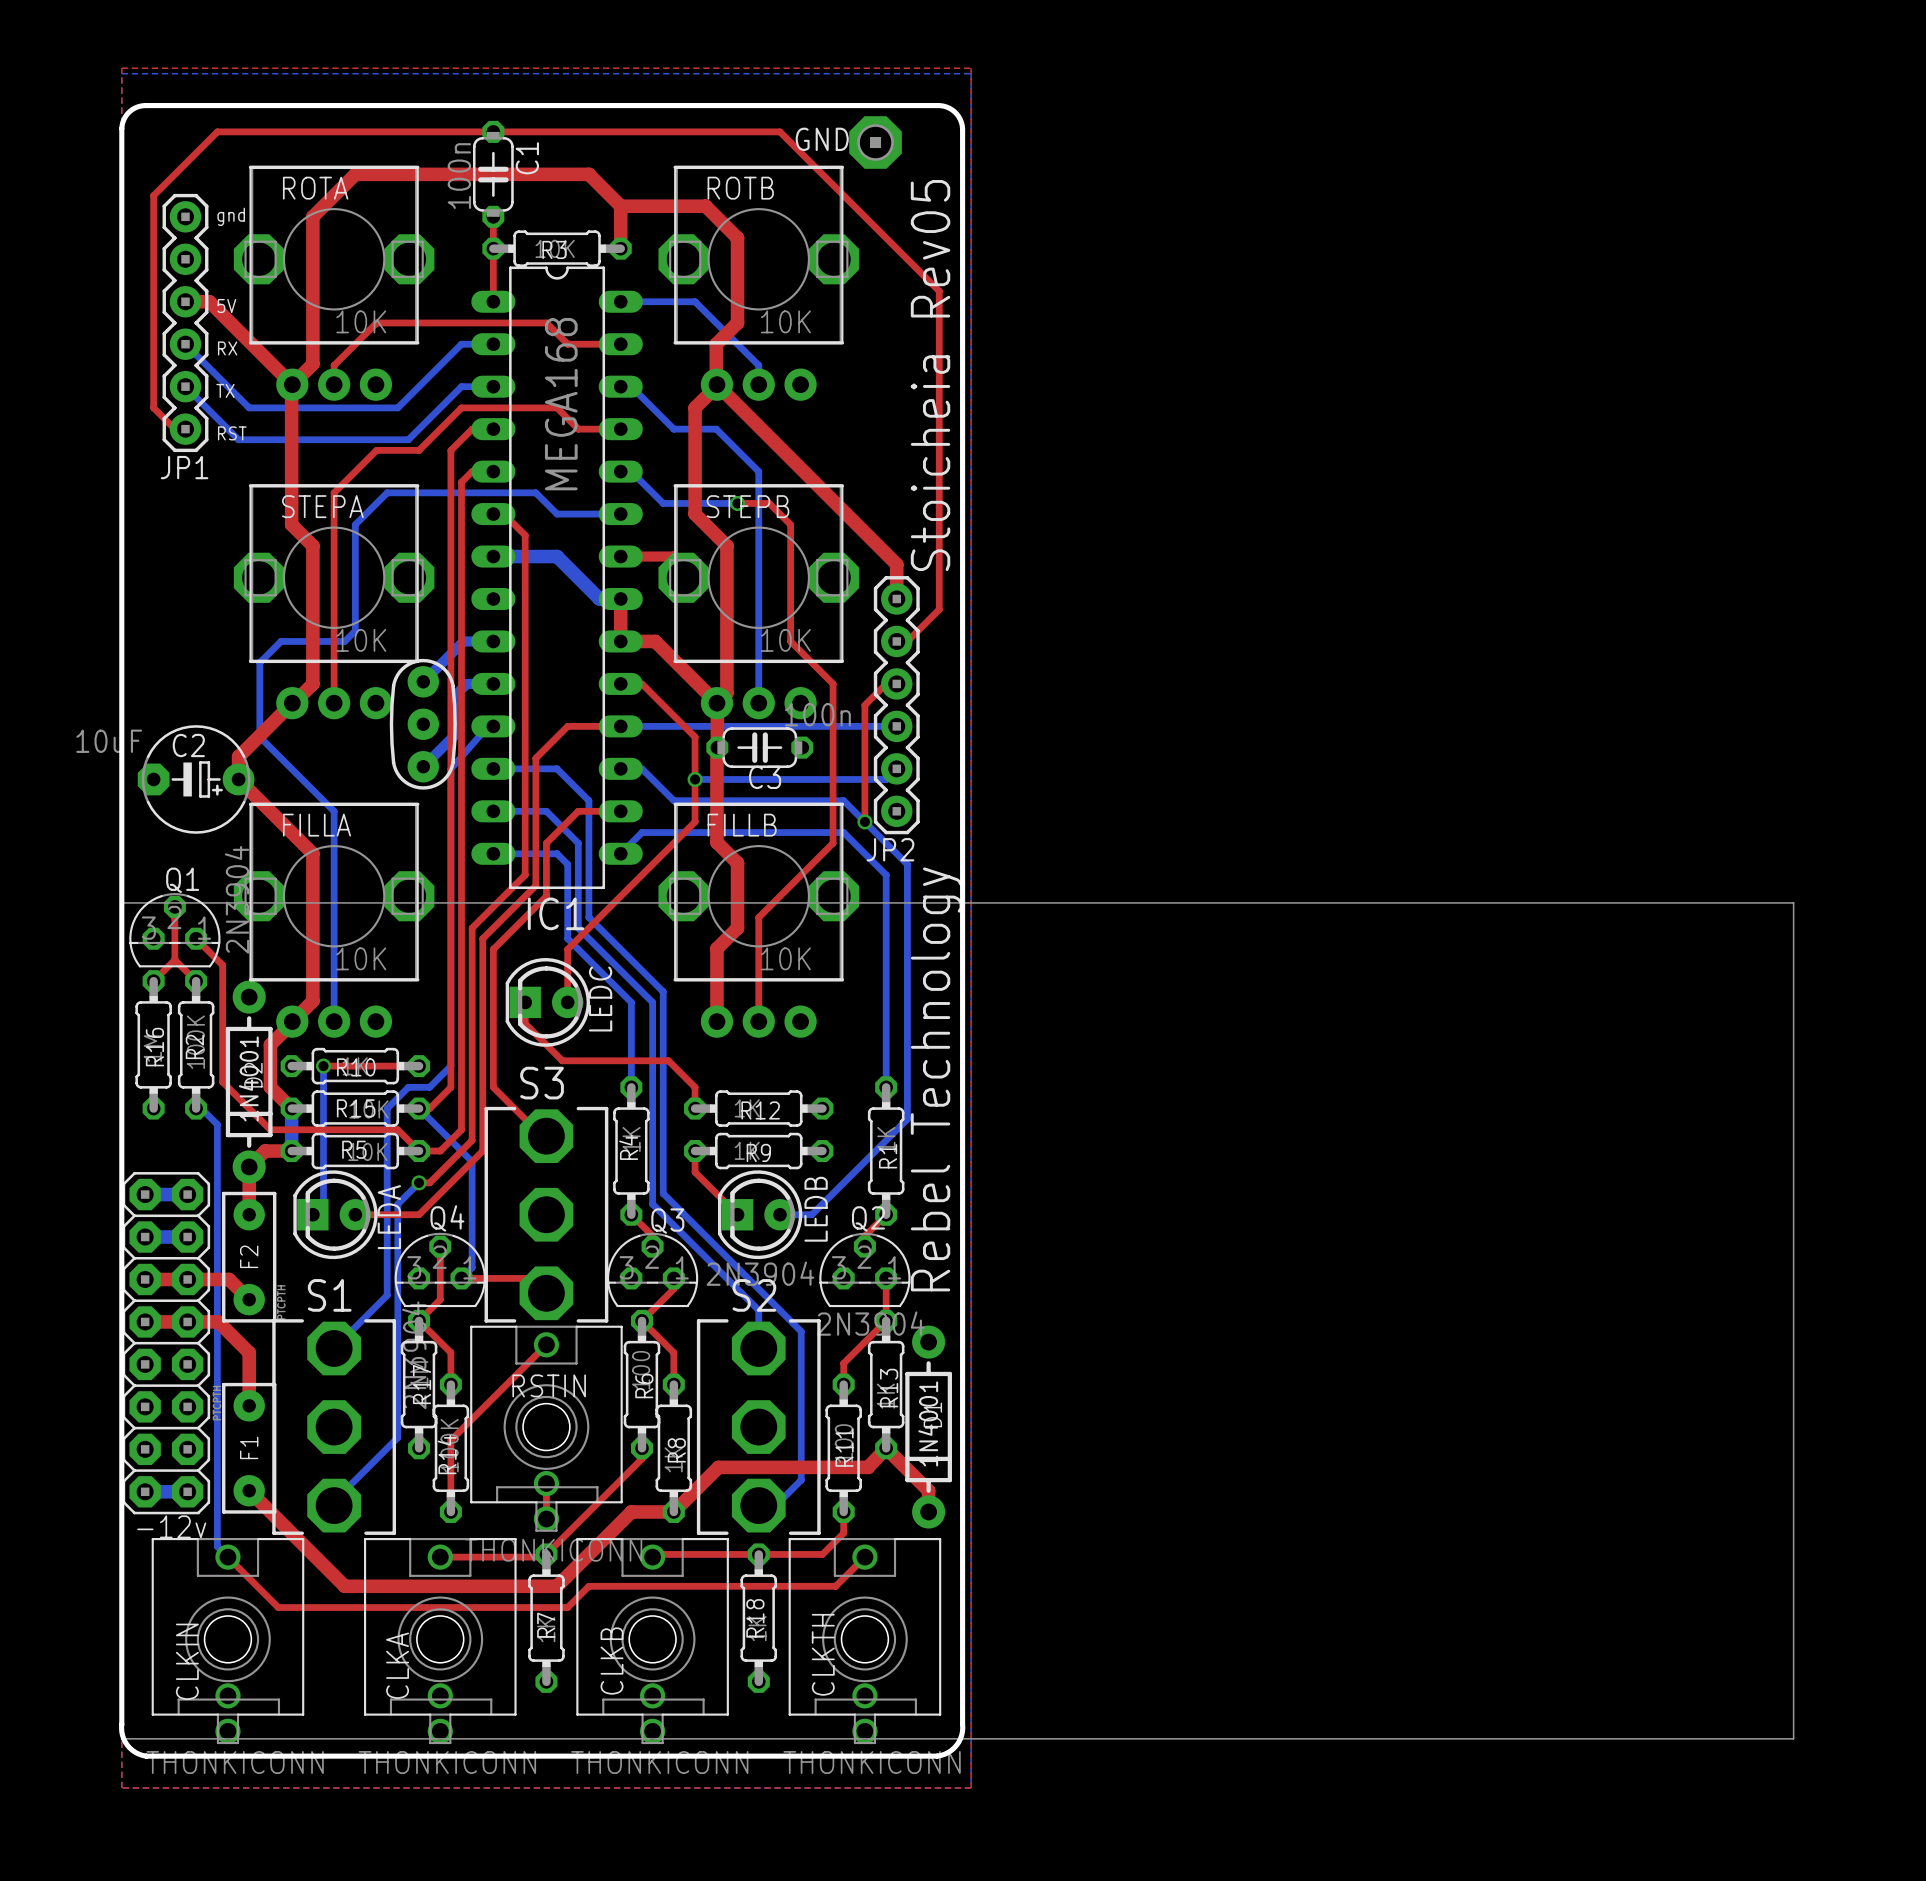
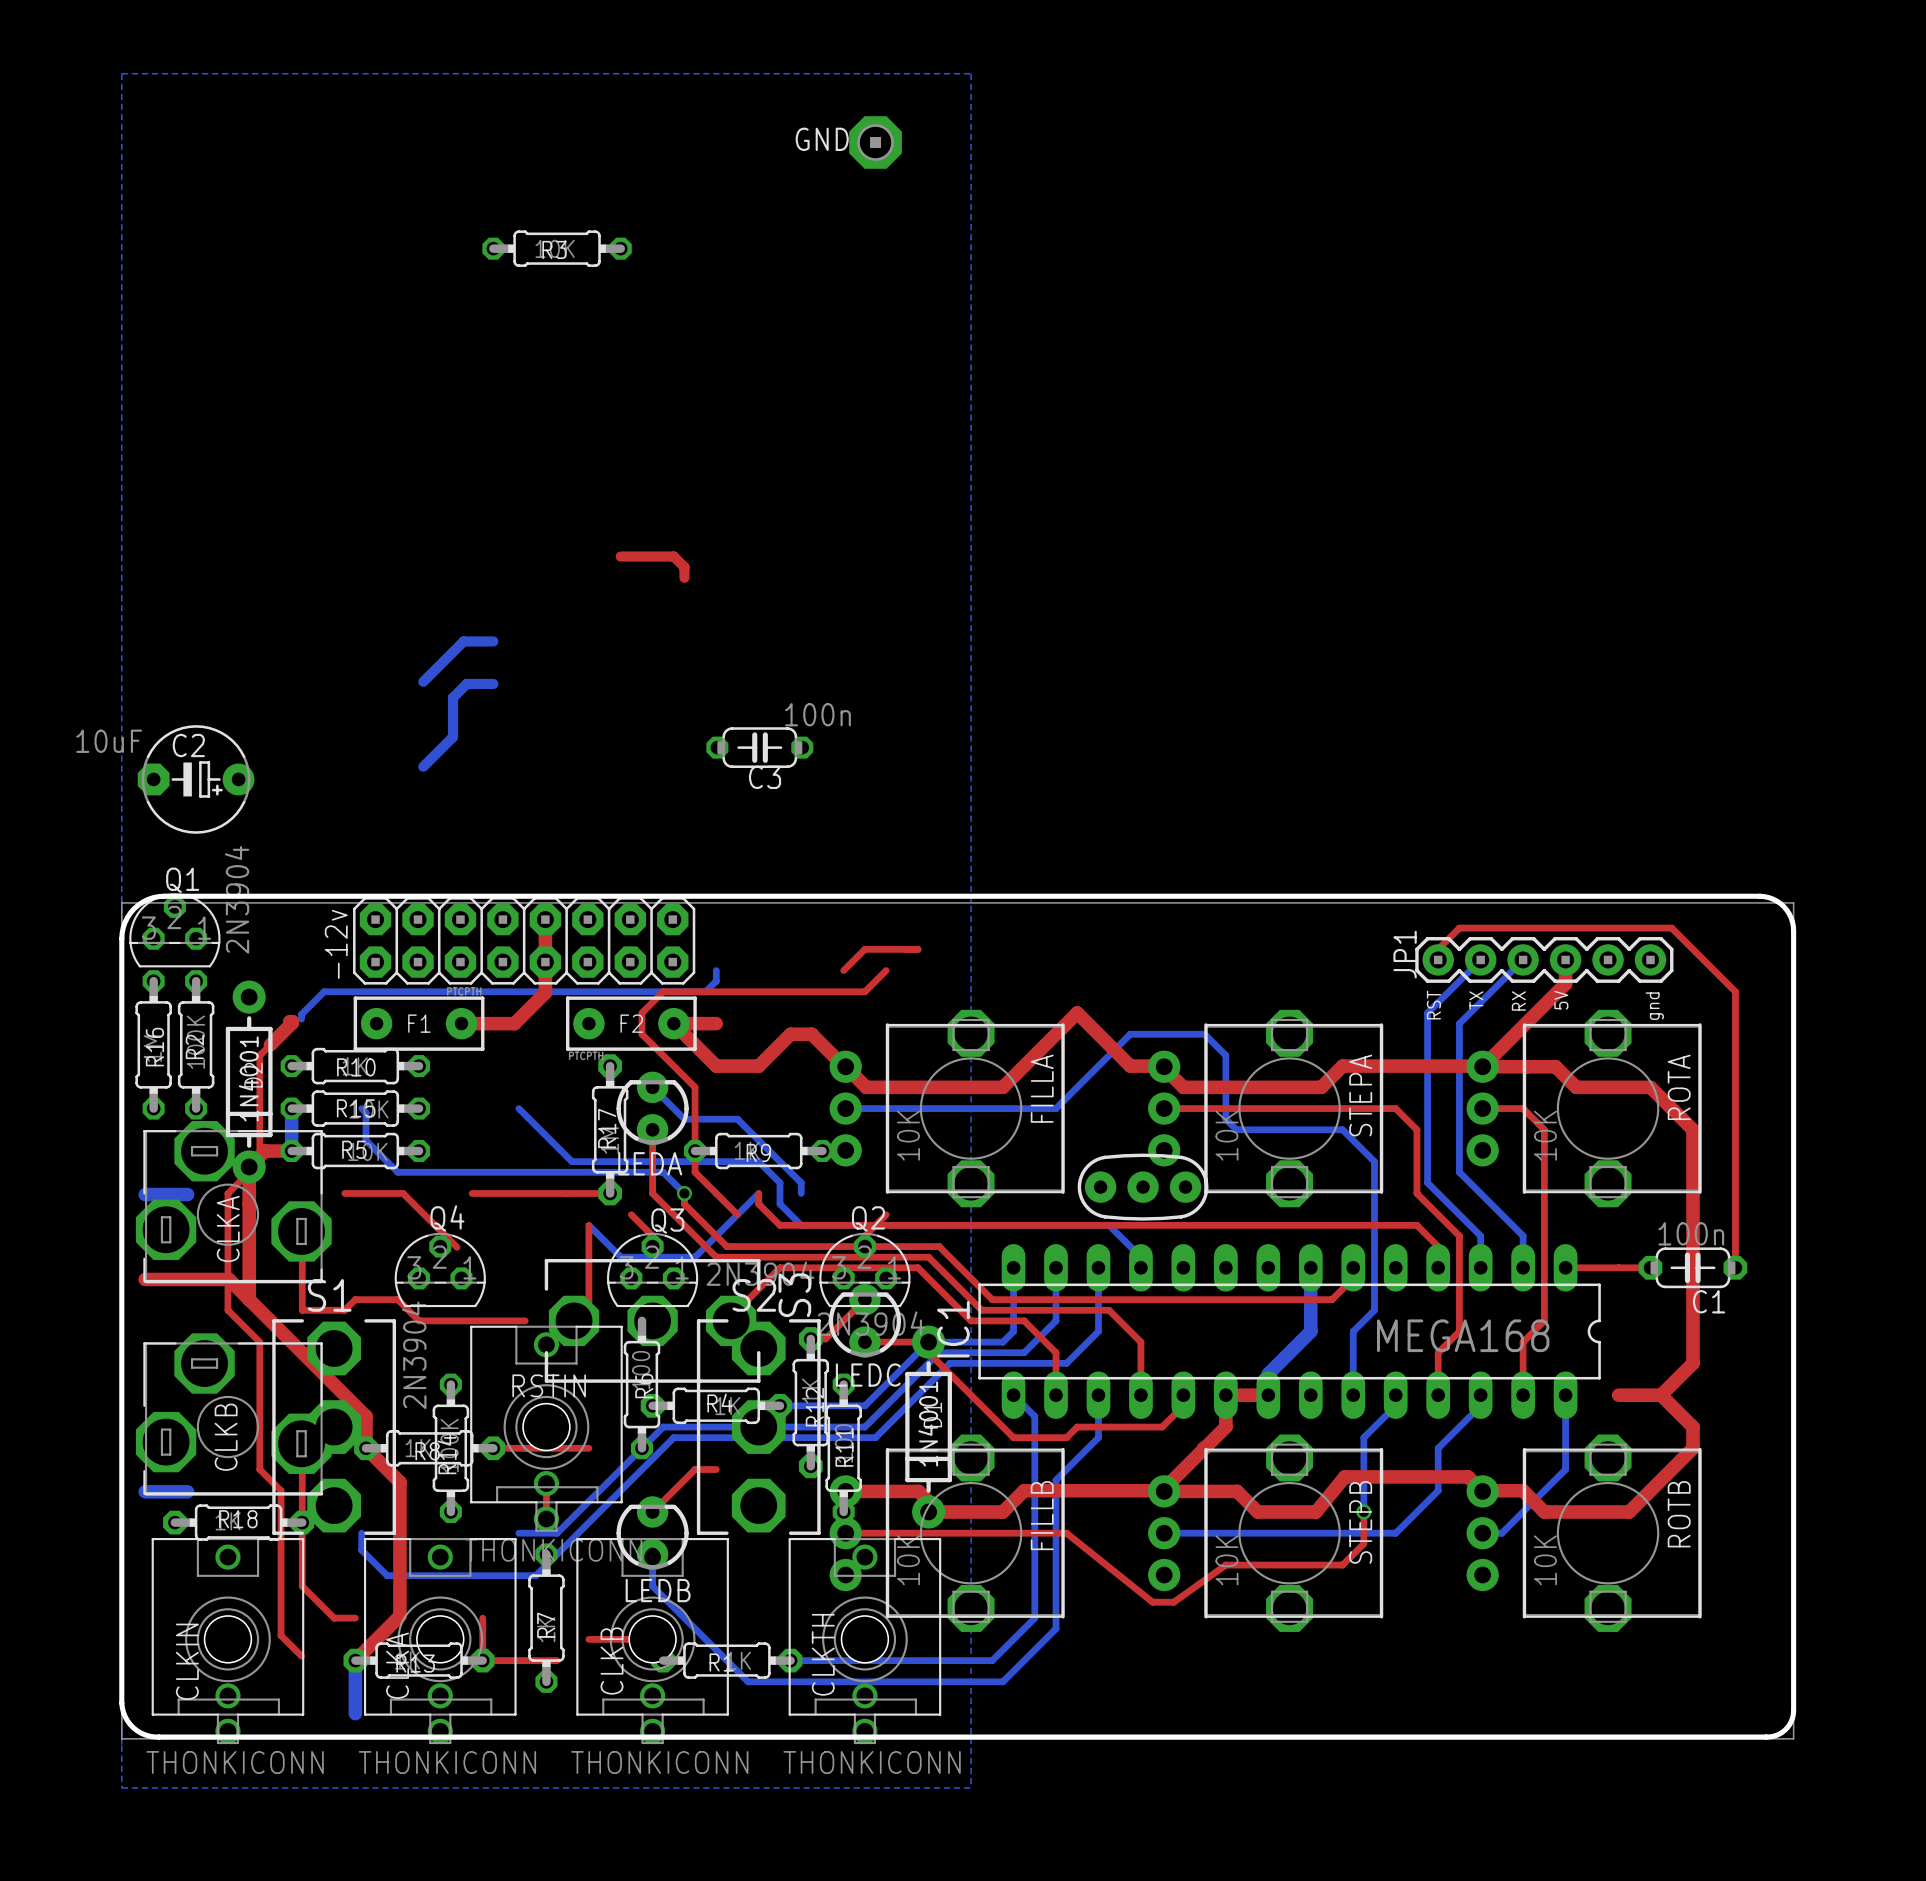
top zone outline: (121, 68) (121, 1787) (971, 1787) (971, 68) (121, 68) -> none
C1 footprint: [472, 120, 514, 228] -> [1638, 1247, 1748, 1289]
C1 name position: C1 (527, 158) -> C1 (1709, 1301)
C1 value position: 100n (459, 176) -> 100n (1691, 1233)
top track: (620, 206) (620, 248) -> none
top track: (620, 206) (705, 206) (737, 238) (737, 322) (716, 344) (716, 384) (896, 564) (896, 599) -> none
top track: (620, 206) (588, 174) (355, 174) (312, 216) (312, 364) (292, 384) -> none
text: gnd (231, 216) -> none
top track: (493, 216) (493, 301) -> none
IC1 footprint: [471, 266, 643, 890] -> [978, 1244, 1601, 1419]
ROTA: 10K (334, 283) -> none
ROTB: 10K (758, 283) -> none
top track: (185, 301) (209, 301) (292, 384) -> none
bottom track: (620, 301) (695, 301) (758, 365) (758, 384) -> none
text: 5V (226, 305) -> none
JP1 rotation: 0° (185, 322) -> 90° clockwise (1544, 959)
JP1 position: (185, 322) -> (1544, 959)
bottom track: (185, 344) (249, 407) (397, 407) (461, 344) (493, 344) -> none
top track: (620, 344) (567, 344) (546, 322) (376, 322) (334, 365) (334, 384) -> none
text: RX (227, 348) -> none
text: Stoicheia Rev05 (930, 375) -> none
top track: (716, 384) (695, 407) (695, 514) (726, 545) (726, 693) (716, 703) -> none
top track: (291, 385) (291, 524) (312, 545) (312, 683) (292, 703) -> none
bottom track: (185, 386) (238, 439) (408, 439) (461, 386) (493, 386) -> none
bottom track: (620, 386) (631, 386) (673, 429) (716, 429) (758, 471) (758, 703) -> none
text: TX (225, 390) -> none
IC1 value position: MEGA168 (561, 404) -> MEGA168 (1463, 1335)
top track: (185, 429) (174, 429) (153, 407) (153, 195) (217, 131) (780, 131) (939, 291) (939, 609) (907, 641) (896, 641) -> none
top track: (493, 429) (472, 429) (450, 450) (450, 1087) (429, 1108) (419, 1108) -> none
top track: (620, 429) (578, 429) (557, 407) (461, 407) (419, 450) (376, 450) (334, 492) (334, 703) -> none
text: RST (232, 433) -> none
top track: (493, 471) (472, 471) (461, 482) (461, 1129) (440, 1151) (419, 1151) (397, 1129) (270, 1129) (222, 1082) (222, 965) (196, 938) -> none
bottom track: (620, 471) (631, 471) (663, 503) (737, 503) -> none
top track: (737, 503) (769, 503) (790, 524) (790, 641) (833, 683) (833, 843) (758, 917) (758, 1021) -> none
via: (737, 503) -> none
top track: (493, 514) (503, 514) (525, 535) (525, 875) (472, 928) (472, 1140) (429, 1182) (419, 1182) -> none
bottom track: (620, 514) (557, 514) (535, 492) (387, 492) (355, 524) (355, 630) (344, 641) (281, 641) (259, 662) (259, 737) (334, 811) (334, 1021) -> none
bottom track: (493, 556) (557, 556) (599, 599) (620, 599) -> none
top track: (620, 599) (620, 641) (655, 641) (717, 703) (716, 842) (737, 863) (737, 928) (716, 948) (716, 1021) -> none
STEPA: 10K (334, 601) -> none
STEPB: 10K (758, 601) -> none
top track: (620, 683) (641, 683) (695, 737) (695, 821) (567, 949) (567, 1002) -> none
top track: (896, 683) (886, 683) (864, 705) (864, 821) -> none
top track: (292, 703) (238, 756) (238, 779) (312, 853) (312, 1001) (292, 1021) -> none
JP2: (896, 705) -> none
part: (423, 724) -> none
bottom track: (493, 726) (488, 726) (450, 768) (450, 1066) (429, 1087) (408, 1087) (387, 1108) (387, 1295) (334, 1348) -> none
bottom track: (620, 726) (896, 726) -> none
top track: (620, 726) (567, 726) (535, 758) (535, 885) (482, 938) (482, 1151) (419, 1214) (355, 1214) -> none
bottom track: (493, 768) (557, 768) (588, 800) (588, 917) (663, 991) (663, 1193) (801, 1331) (801, 1480) (775, 1505) (758, 1505) -> none
bottom track: (620, 768) (641, 768) (673, 800) (843, 800) (907, 864) (907, 1119) (811, 1214) (780, 1214) -> none
bottom track: (896, 768) (886, 779) (695, 779) -> none
via: (695, 779) -> none
bottom track: (493, 811) (546, 811) (578, 843) (578, 928) (652, 1002) (652, 1204) (758, 1310) (758, 1348) -> none
top track: (620, 811) (578, 811) (546, 843) (546, 896) (493, 949) (493, 1087) (542, 1136) (546, 1136) -> none
via: (864, 821) -> none
bottom track: (493, 853) (557, 853) (567, 864) (567, 938) (631, 1002) (631, 1087) -> none
bottom track: (620, 853) (641, 832) (843, 832) (886, 875) (886, 1087) -> none
top track: (174, 906) (174, 959) -> none
IC1 name position: IC1 (556, 913) -> IC1 (953, 1329)
top track: none -> (545, 919) (545, 992) (514, 1023) (461, 1023)
FILLA: 10K (334, 920) -> none
FILLB: 10K (758, 920) -> none
board edge: (121, 938) (121, 128) (123, 119) (129, 112) (137, 107) (146, 105) (937, 105) (946, 106) (954, 111) (960, 119) (962, 128) (962, 1728) (958, 1742) (951, 1750) (937, 1756) (146, 1756) (132, 1750) (123, 1738) (121, 1728) (121, 1703) -> (121, 938) (125, 922) (134, 908) (148, 899) (164, 896) (1759, 896) (1772, 899) (1780, 903) (1789, 914) (1793, 931) (1793, 1711) (1791, 1721) (1785, 1729) (1776, 1735) (1766, 1737) (158, 1737) (145, 1734) (133, 1727) (125, 1716) (121, 1703)
part: none -> (524, 940)
text: none -> -12v (336, 944)
top track: none -> (918, 949) (864, 949) (843, 970)
top track: (174, 959) (196, 981) -> none
top track: (174, 959) (153, 981) -> none
top track: none -> (1438, 959) (1438, 949) (1459, 928) (1671, 928) (1735, 991) (1735, 1267)
bottom track: none -> (1480, 959) (1427, 1013) (1427, 1182) (1480, 1235) (1480, 1267)
bottom track: none -> (1523, 959) (1459, 1023) (1459, 1172) (1523, 1235) (1523, 1267)
top track: none -> (1565, 959) (1565, 983) (1482, 1066)
bottom track: none -> (716, 970) (716, 981) (705, 991) (324, 991) (301, 1014) (301, 1019)
text: none -> TX (1476, 1000)
text: none -> RX (1518, 1000)
text: none -> 5V (1561, 1000)
top track: (525, 1002) (525, 1023) (562, 1060) (668, 1060) -> (886, 970) (864, 991) (663, 991) (641, 1013) (641, 1034) (668, 1060)
LEDC: (547, 1002) -> none
text: none -> RST (1433, 1005)
text: none -> gnd (1654, 1006)
top track: none -> (716, 1023) (673, 1023) (716, 1066) (758, 1066) (790, 1034) (811, 1034) (845, 1066)
top track: (270, 1044) (270, 1087) (291, 1108) -> (270, 1044) (259, 1055) (259, 1161) (227, 1193) (227, 1310) (259, 1342) (259, 1469) (281, 1490) (281, 1635) (301, 1656)
bottom track: (323, 1066) (323, 1204) (312, 1214) -> none
top track: (323, 1066) (419, 1066) -> none
via: (323, 1066) -> none
top track: none -> (845, 1066) (866, 1087) (1002, 1087) (1077, 1013) (1130, 1066) (1164, 1066)
top track: none -> (1164, 1066) (1183, 1087) (1321, 1087) (1342, 1066) (1482, 1066)
top track: none -> (1482, 1066) (1555, 1066) (1576, 1087) (1650, 1087) (1692, 1129) (1692, 1363) (1661, 1395)
R4 footprint: [613, 1076, 650, 1226] -> [640, 1387, 792, 1425]
R1 footprint: [867, 1076, 905, 1226] -> [651, 1642, 803, 1679]
text: Rebel Technology (936, 1079) -> none
S3 name position: S3 (542, 1083) -> S3 (794, 1295)
bottom track: none -> (652, 1087) (684, 1119) (737, 1119) (801, 1182) (801, 1193)
R12 footprint: [684, 1090, 834, 1127] -> [792, 1327, 830, 1479]
S3 footprint: [484, 1106, 609, 1323] -> [544, 1259, 761, 1383]
bottom track: (196, 1108) (201, 1108) (217, 1124) (217, 1546) (227, 1557) -> none
bottom track: none -> (361, 1108) (365, 1112) (365, 1140) (397, 1172) (663, 1172) (684, 1193)
bottom track: (419, 1108) (472, 1161) (472, 1267) (461, 1278) -> none
bottom track: none -> (518, 1108) (571, 1161) (758, 1161) (780, 1182) (780, 1204) (801, 1225) (1109, 1225) (1140, 1257) (1140, 1267)
LEDA: none -> (652, 1108)
top track: none -> (695, 1108) (695, 1151)
bottom track: none -> (845, 1108) (1056, 1108) (1130, 1034) (1204, 1034) (1225, 1055) (1225, 1119) (1236, 1129) (1342, 1129) (1374, 1161) (1374, 1310) (1353, 1331) (1353, 1395)
FILLA: none -> 10K (947, 1108)
top track: none -> (1164, 1108) (1395, 1108) (1416, 1129) (1416, 1193) (1459, 1235) (1459, 1331) (1438, 1352) (1438, 1395)
STEPA: none -> 10K (1265, 1108)
top track: none -> (1482, 1108) (1523, 1108) (1544, 1129) (1544, 1320) (1523, 1342) (1523, 1395)
ROTA: none -> 10K (1584, 1108)
top track: none -> (652, 1129) (652, 1193) (716, 1257) (928, 1257) (981, 1310) (1109, 1310) (1140, 1342) (1140, 1395)
bottom track: (419, 1182) (397, 1204) (397, 1437) (334, 1501) (334, 1505) -> none
via: (419, 1182) -> none
part: none -> (1143, 1187)
top track: none -> (344, 1193) (403, 1193) (457, 1247)
top track: none -> (472, 1193) (610, 1193)
top track: none -> (684, 1193) (684, 1204) (726, 1246) (939, 1246) (992, 1299) (1332, 1299) (1353, 1278) (1353, 1267)
via: none -> (684, 1193)
bottom track: none -> (758, 1193) (695, 1257) (620, 1257) (588, 1225)
top track: none -> (758, 1193) (758, 1204) (780, 1225) (1416, 1225) (1438, 1246) (1438, 1267)
CLKA: none -> (233, 1202)
top track: none -> (249, 1214) (249, 1299) (365, 1416) (365, 1448) (399, 1482) (399, 1616) (355, 1660)
LEDA: (335, 1214) -> none
LEDB: (760, 1214) -> none
top track: none -> (588, 1225) (588, 1306) (574, 1320)
top track: none -> (301, 1231) (302, 1310) (344, 1310) (355, 1299) (397, 1299) (419, 1320) (525, 1320)
top track: (440, 1246) (440, 1299) (419, 1320) (450, 1352) (450, 1384) -> none
F2 rotation: 0° (249, 1257) -> 90° clockwise (631, 1023)
F2 position: (249, 1257) -> (631, 1023)
bottom track: none -> (1013, 1267) (1013, 1331) (1002, 1342) (928, 1342) (864, 1405) (780, 1405)
bottom track: none -> (1056, 1267) (1056, 1320) (1024, 1352) (939, 1352) (864, 1427) (663, 1427) (557, 1533) (518, 1533)
bottom track: none -> (1098, 1267) (1098, 1331) (1066, 1363) (949, 1363) (875, 1437) (673, 1437) (535, 1575) (387, 1575) (361, 1550) (361, 1533)
bottom track: none -> (1310, 1267) (1310, 1331) (1268, 1373) (1268, 1395)
top track: none -> (1565, 1267) (1650, 1267)
top track: (461, 1278) (531, 1278) (546, 1293) -> none
top track: (673, 1278) (673, 1289) (641, 1320) (673, 1352) (673, 1384) -> none
top track: (886, 1278) (886, 1320) (843, 1363) (843, 1384) -> none
top track: none -> (864, 1299) (825, 1338) (810, 1338)
R17 footprint: [400, 1309, 438, 1460] -> [591, 1054, 629, 1206]
R13 footprint: [867, 1309, 905, 1460] -> [343, 1642, 495, 1679]
top track: none -> (731, 1320) (731, 1316) (780, 1267) (918, 1267) (971, 1320) (1024, 1320) (1056, 1352) (1056, 1395)
LEDC: none -> (864, 1320)
top track: (145, 1321) (218, 1321) (249, 1352) (249, 1405) -> none
top track: none -> (864, 1342) (918, 1342) (1013, 1437) (1066, 1437) (1077, 1427) (1162, 1427) (1183, 1405) (1183, 1395)
part: (166, 1343) -> none
top track: (546, 1344) (450, 1440) (450, 1511) -> none
R8 footprint: [655, 1373, 693, 1524] -> [354, 1430, 506, 1467]
bottom track: none -> (1013, 1395) (1034, 1416) (1034, 1618) (992, 1660) (790, 1660)
bottom track: none -> (1098, 1395) (1098, 1437) (1056, 1480) (1056, 1628) (1002, 1681) (748, 1681) (652, 1586) (652, 1554)
top track: none -> (1268, 1395) (1225, 1395) (1225, 1427) (1162, 1490)
bottom track: none -> (1395, 1395) (1395, 1405) (1363, 1437) (1363, 1511)
bottom track: none -> (1480, 1395) (1480, 1405) (1438, 1448) (1438, 1490) (1395, 1533) (1164, 1533)
bottom track: none -> (1565, 1395) (1565, 1469) (1501, 1533) (1482, 1533)
top track: none -> (1618, 1395) (1661, 1395)
top track: none -> (1661, 1395) (1692, 1427) (1692, 1448) (1629, 1511) (1544, 1511) (1523, 1490) (1482, 1491) (1468, 1476) (1344, 1476) (1316, 1511) (1257, 1511) (1237, 1491) (1024, 1490) (1002, 1511) (939, 1511) (918, 1491) (845, 1491)
CLKB: none -> (233, 1414)
top track: none -> (301, 1443) (302, 1586) (334, 1618) (355, 1618)
F1 rotation: 0° (249, 1448) -> 90° clockwise (419, 1023)
F1 position: (249, 1448) -> (419, 1023)
top track: none -> (493, 1448) (588, 1448)
top track: (641, 1448) (641, 1458) (543, 1557) (440, 1557) -> none
top track: none -> (716, 1469) (695, 1469) (652, 1511)
top track: (249, 1490) (344, 1586) (557, 1586) (631, 1511) (673, 1511) (718, 1467) (868, 1467) (886, 1448) (928, 1490) (928, 1511) -> none
top track: (843, 1511) (843, 1533) (822, 1554) (655, 1554) (652, 1557) -> none
top track: none -> (1363, 1511) (1363, 1543) (1342, 1565) (1225, 1565) (1173, 1602) (1152, 1602) (1066, 1533) (845, 1533)
via: none -> (1363, 1511)
text: -12v (171, 1526) -> none
LEDB: none -> (652, 1533)
FILLB: none -> 10K (947, 1533)
STEPB: none -> 10K (1265, 1533)
ROTB: none -> 10K (1584, 1533)
R18 footprint: [740, 1543, 778, 1693] -> [162, 1504, 315, 1541]
top track: (227, 1557) (278, 1607) (567, 1607) (588, 1586) (835, 1586) (864, 1557) -> none
top track: none -> (482, 1618) (482, 1660) (557, 1660)
top track: none -> (588, 1639) (641, 1639) (663, 1660)
bottom track: none -> (355, 1660) (355, 1713)

